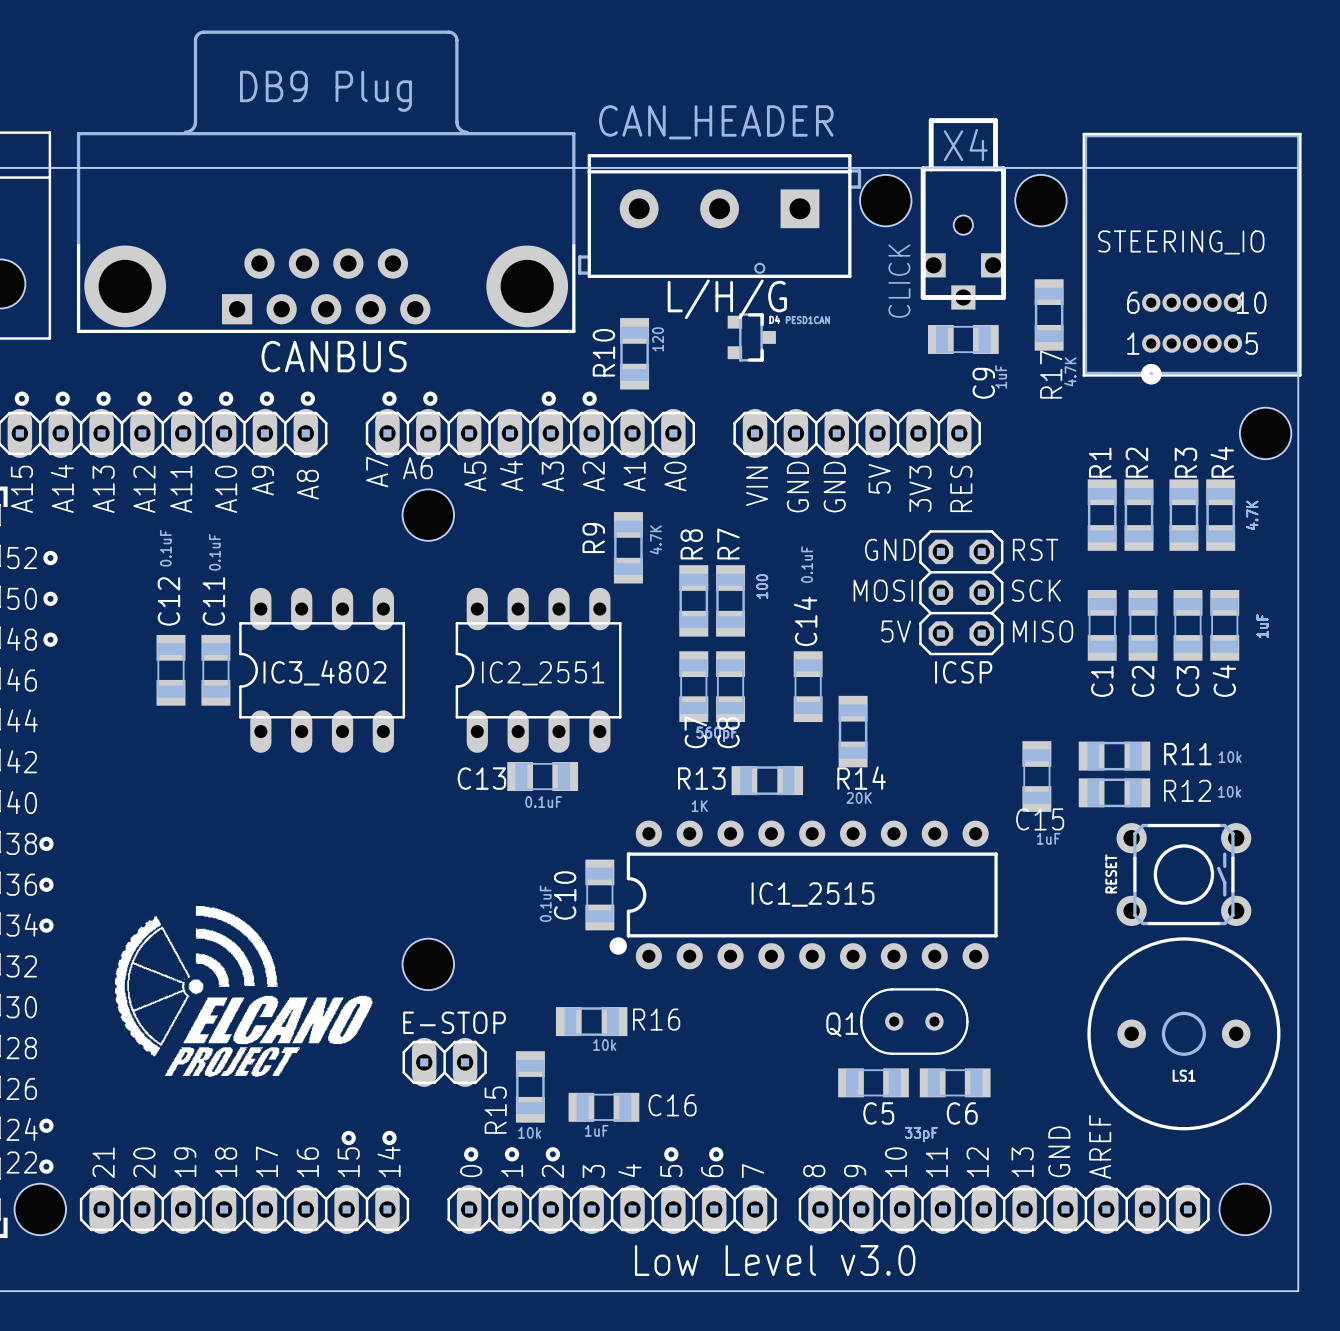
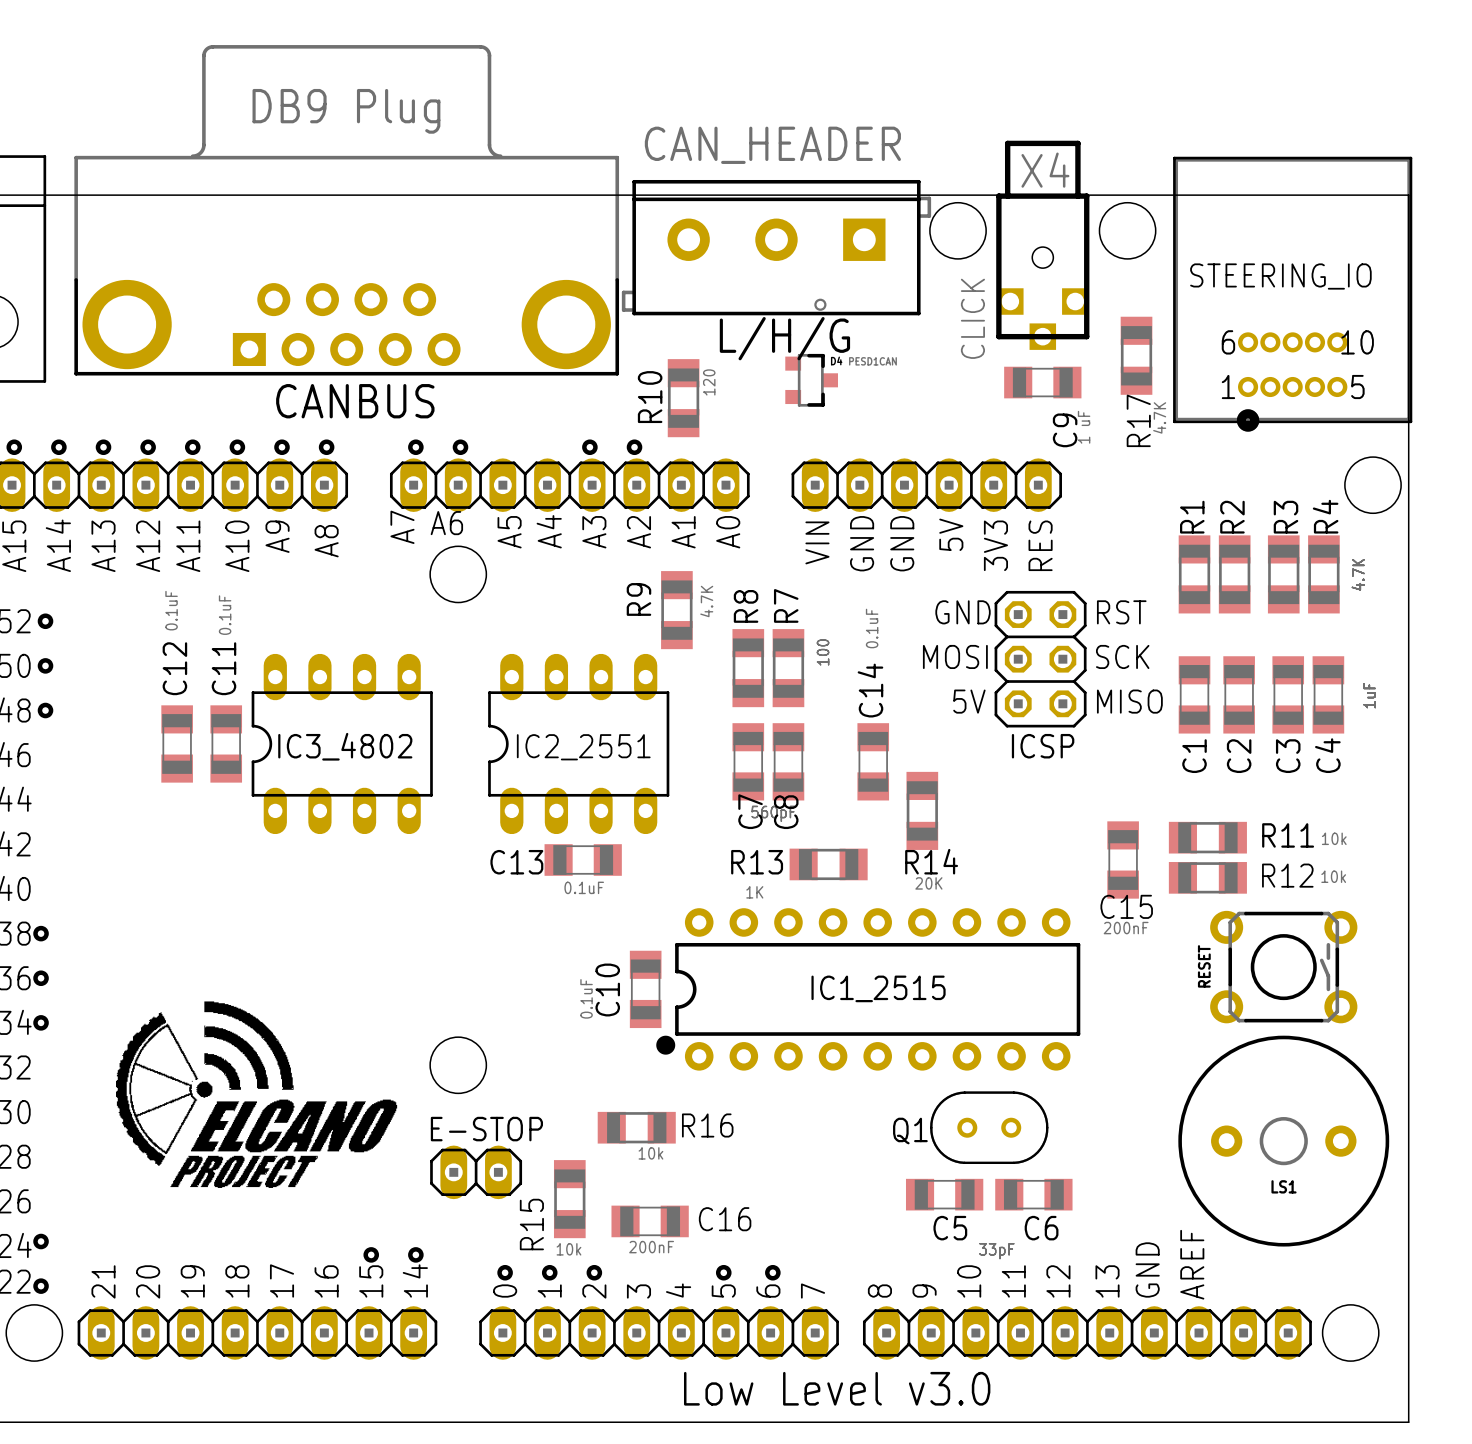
C9 value: 1uF (1001, 376) -> 1 uF (1084, 427)
C15 value: 1uF (1048, 838) -> 200nF (1126, 928)
C16 value: 1uF (596, 1130) -> 200nF (651, 1247)

